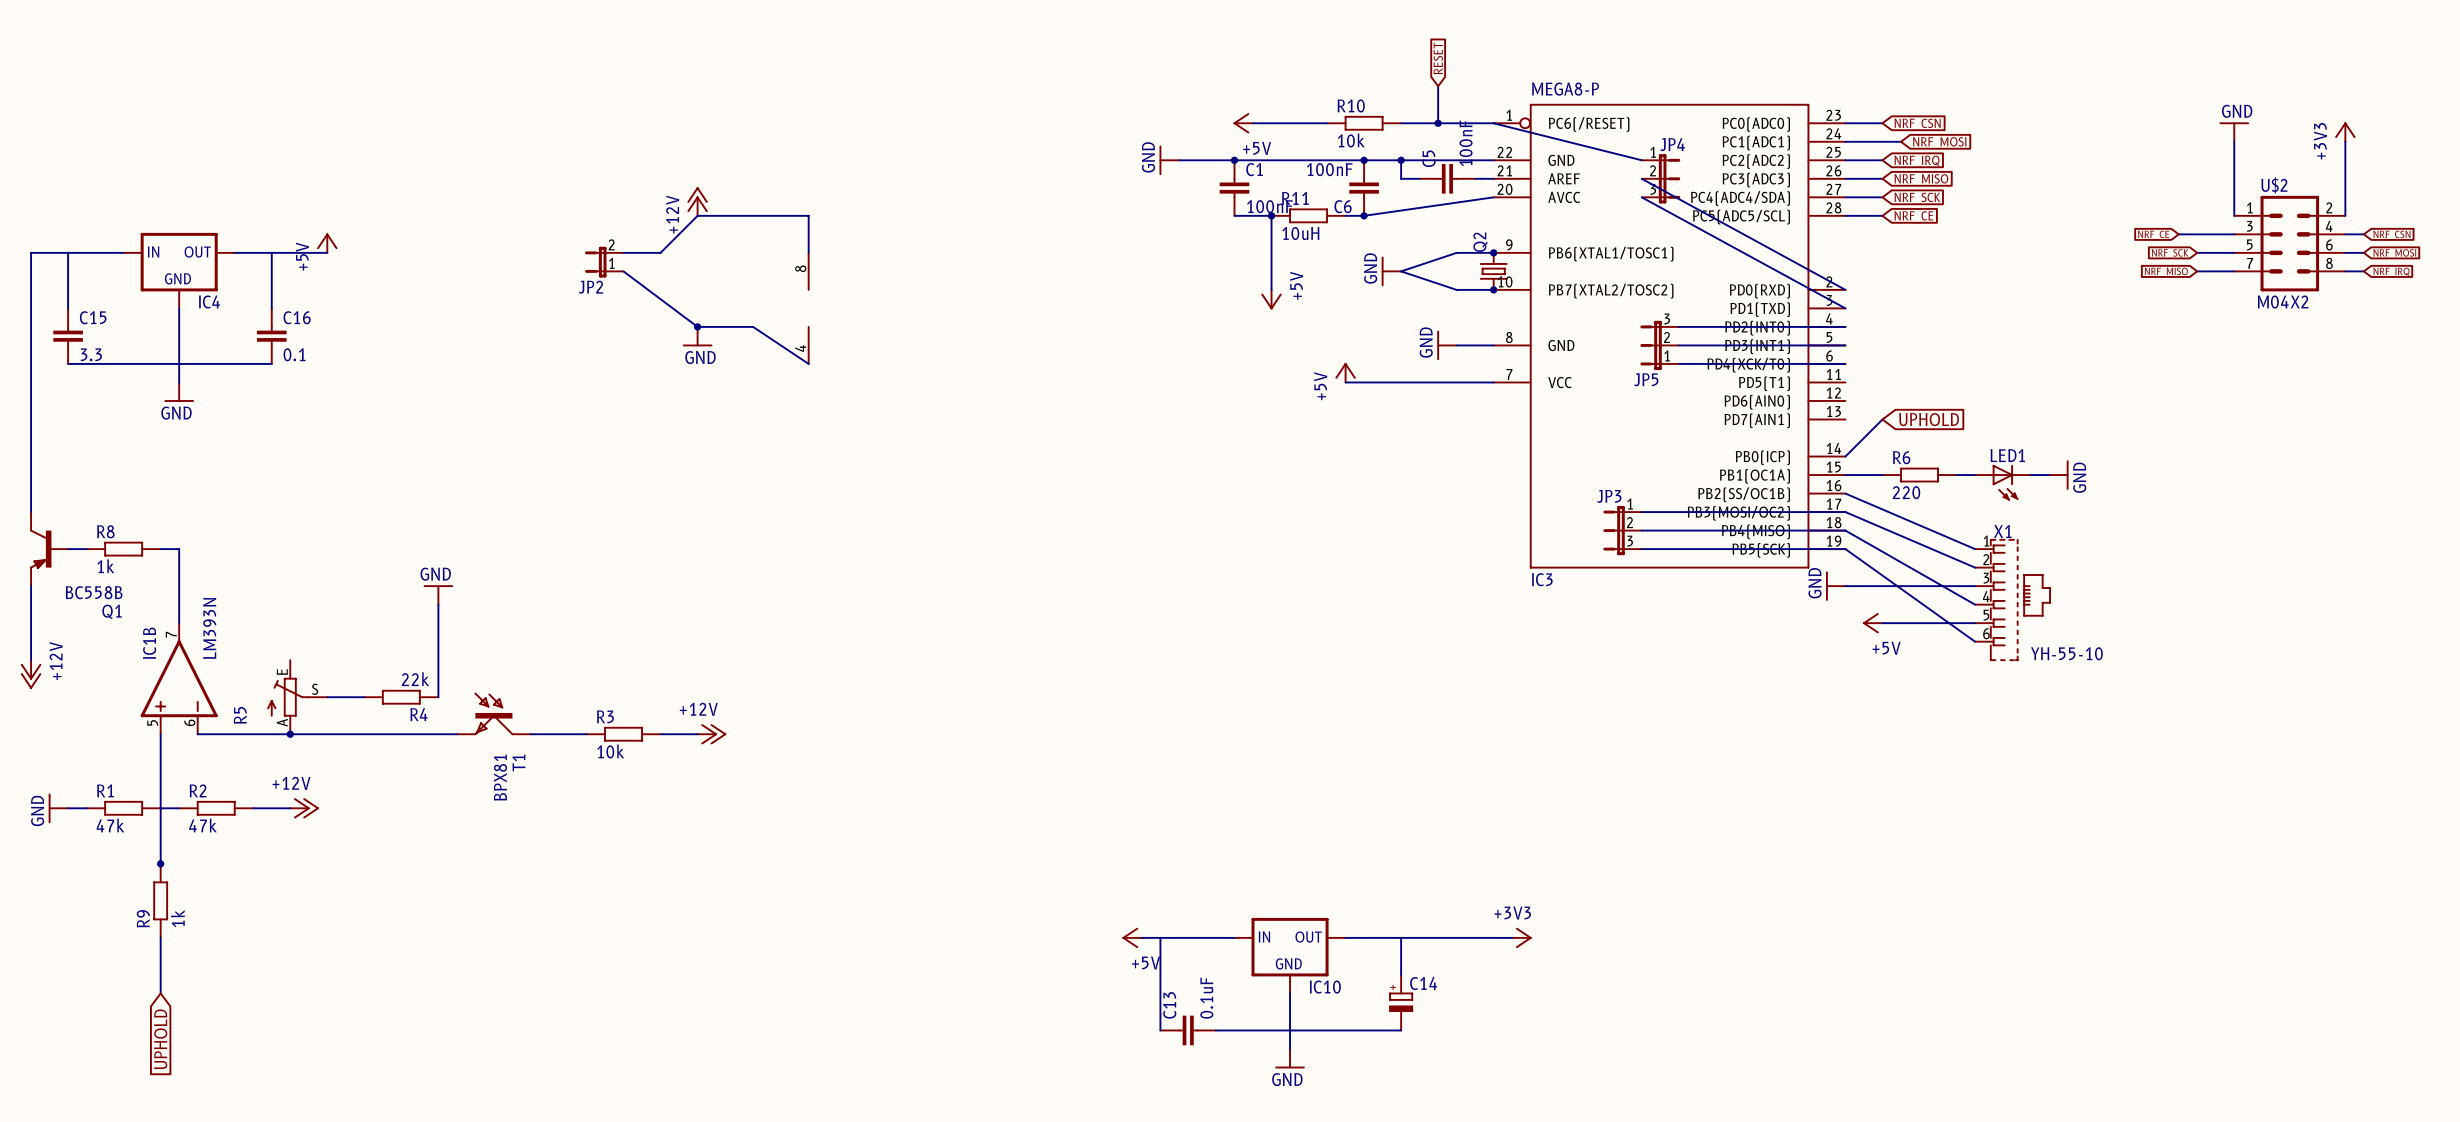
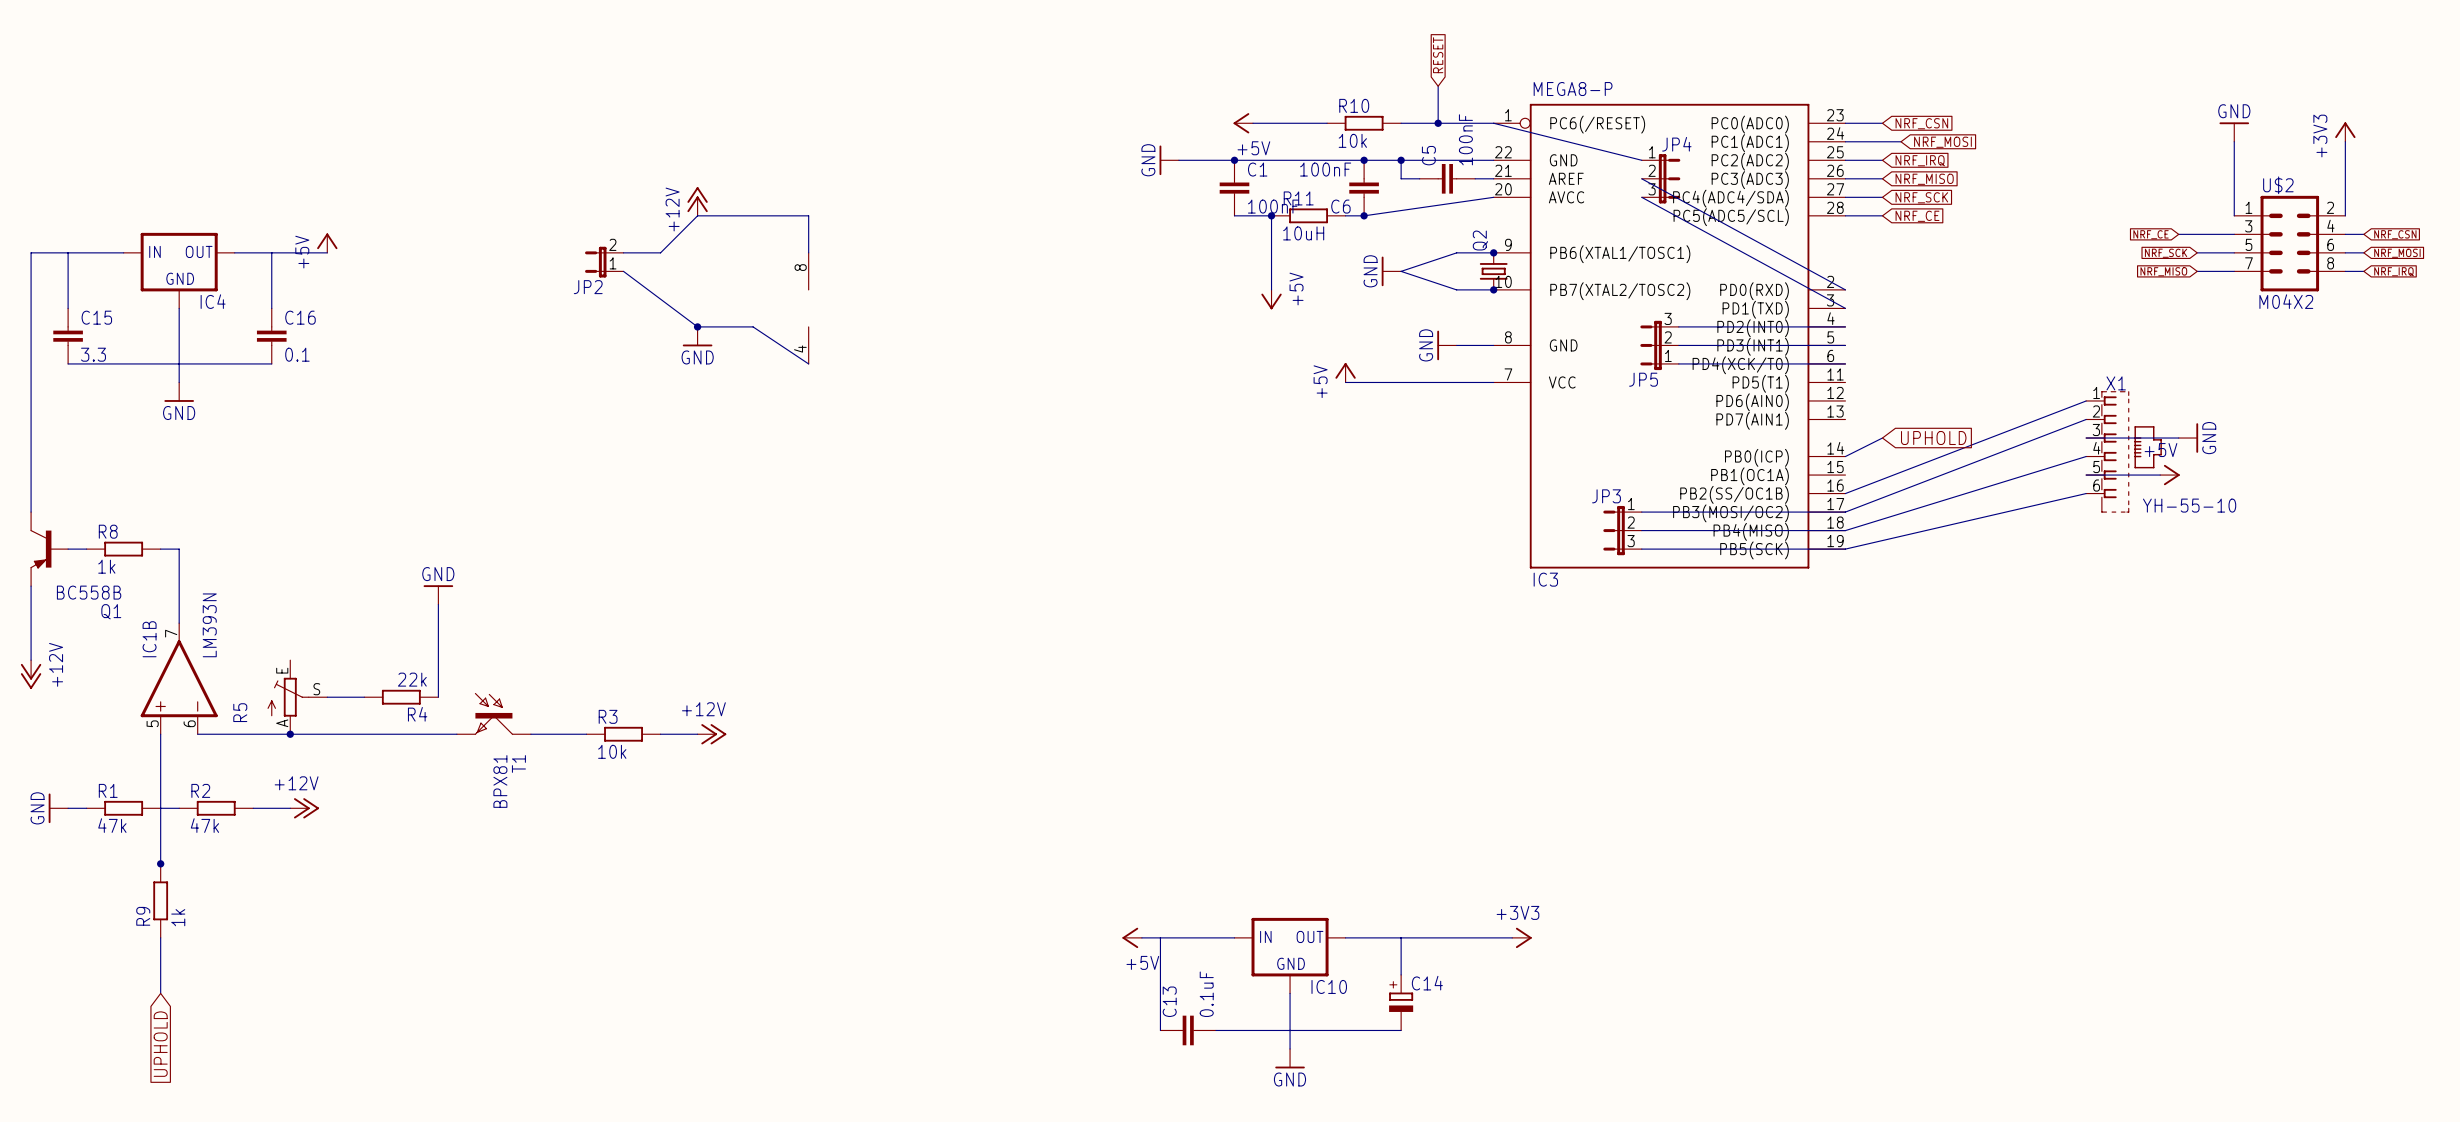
wire: (1882, 419) (1845, 456) -> (1882, 438) (1845, 456)
global label position: UPHOLD (1929, 419) -> UPHOLD (1933, 438)
wire: none -> (2086, 438) (2178, 438)
wire: (1845, 475) (1882, 475) -> none
R6: 220 (1919, 475) -> none
wire: (1956, 475) (1975, 475) -> none
wire: (2030, 475) (2049, 475) -> none
power symbol position: GND (2058, 475) -> GND (2188, 438)
wire: none -> (2086, 475) (2160, 475)
power symbol: none -> +5V (2169, 475)
LED1: (2002, 482) -> none
wire: (1845, 493) (1975, 549) -> (1845, 493) (2086, 400)
wire: (1845, 512) (1975, 567) -> (1845, 512) (2086, 419)
wire: (1845, 530) (1975, 604) -> (1845, 530) (2086, 456)
wire: (1845, 549) (1975, 641) -> (1845, 549) (2086, 493)
power symbol: GND (1835, 586) -> none
wire: (1845, 586) (1975, 586) -> none
X1 position: (2012, 600) -> (2124, 451)
power symbol: +5V (1872, 623) -> none
wire: (1882, 623) (1975, 623) -> none

